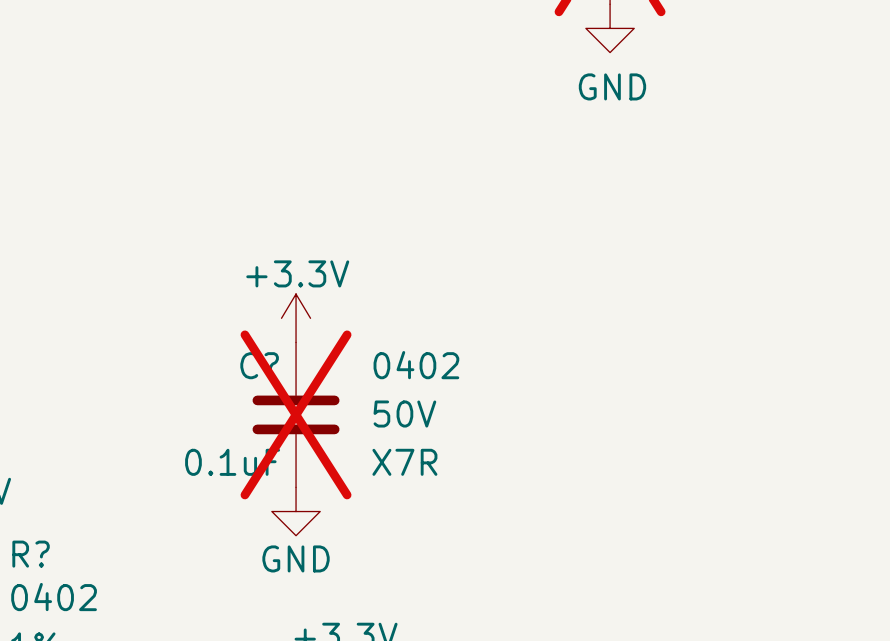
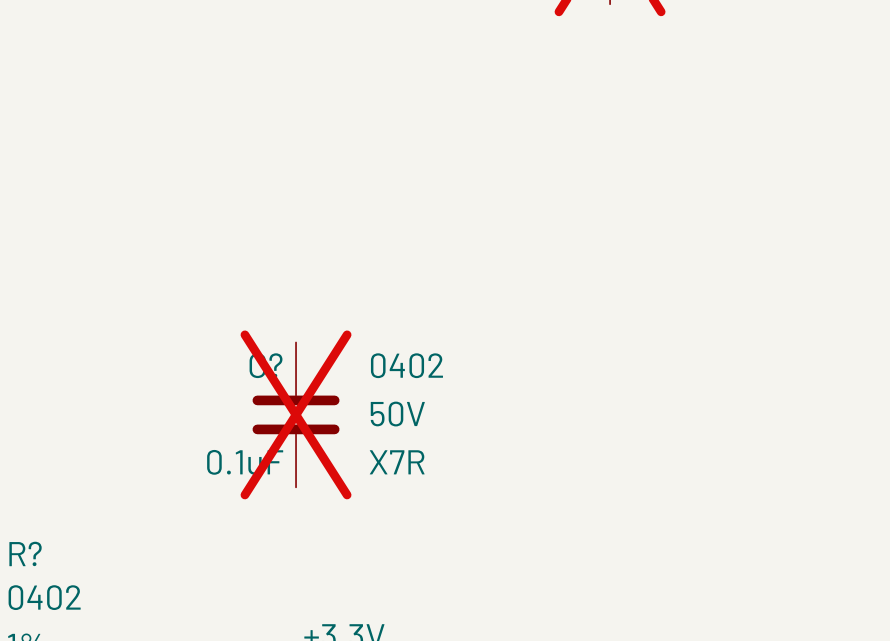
power symbol: GND (610, 28) -> none
power symbol: +3.3V (296, 318) -> none
power symbol: GND (296, 511) -> none

